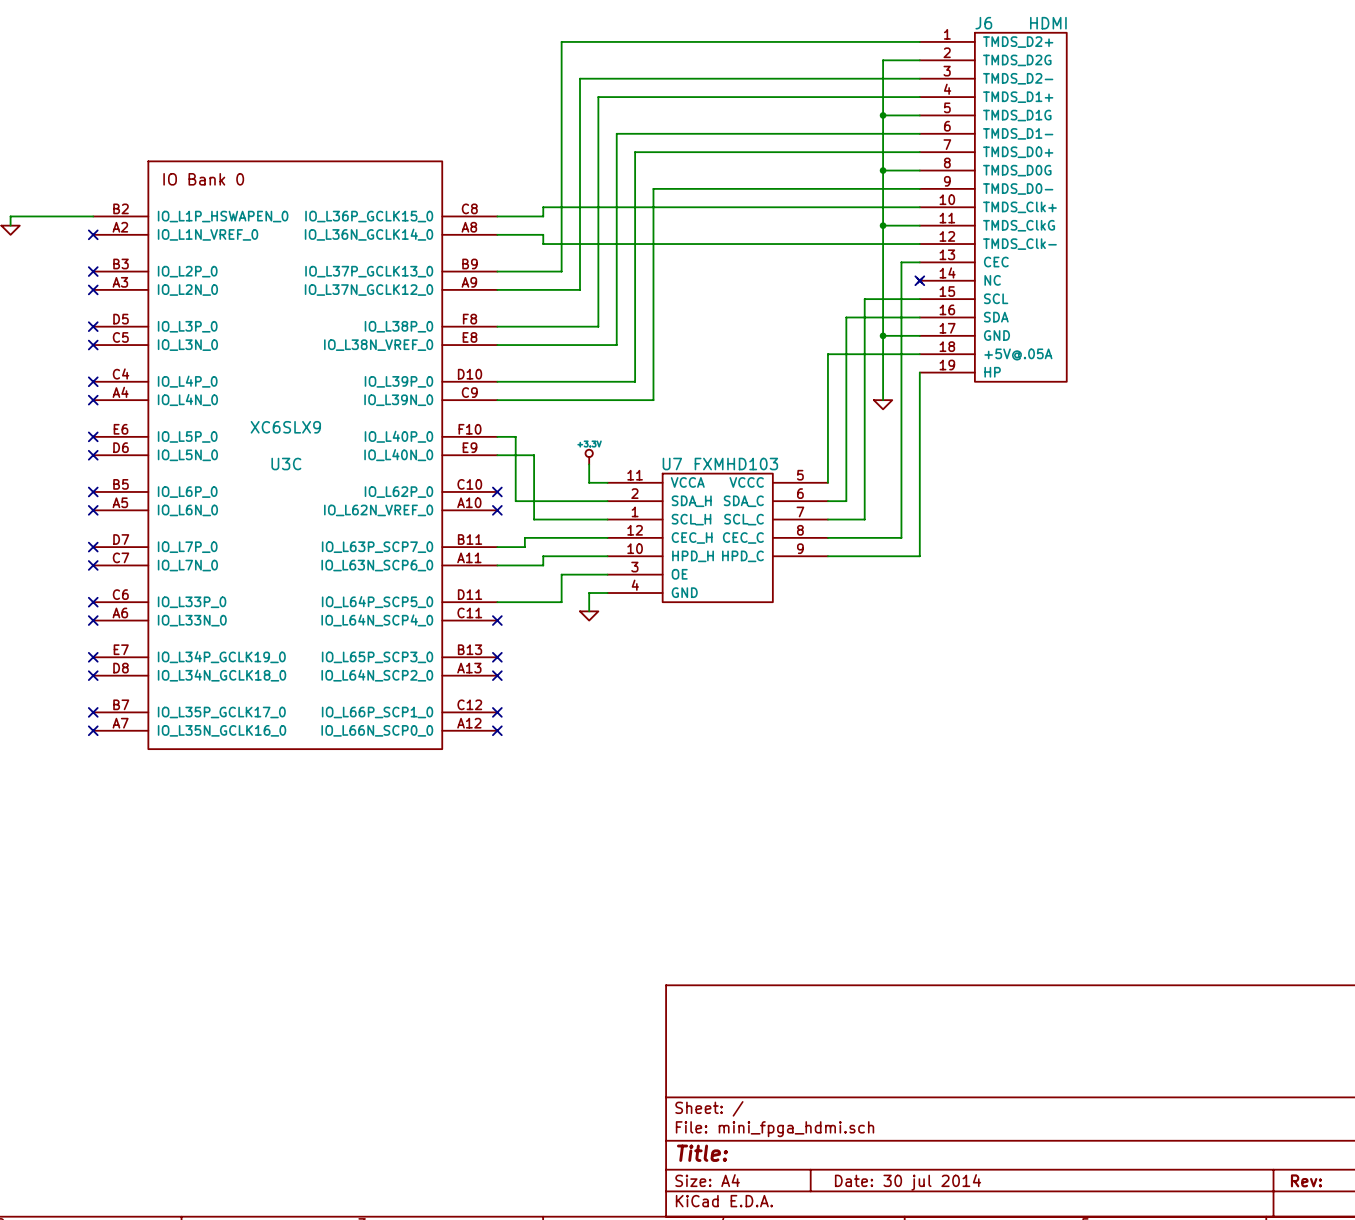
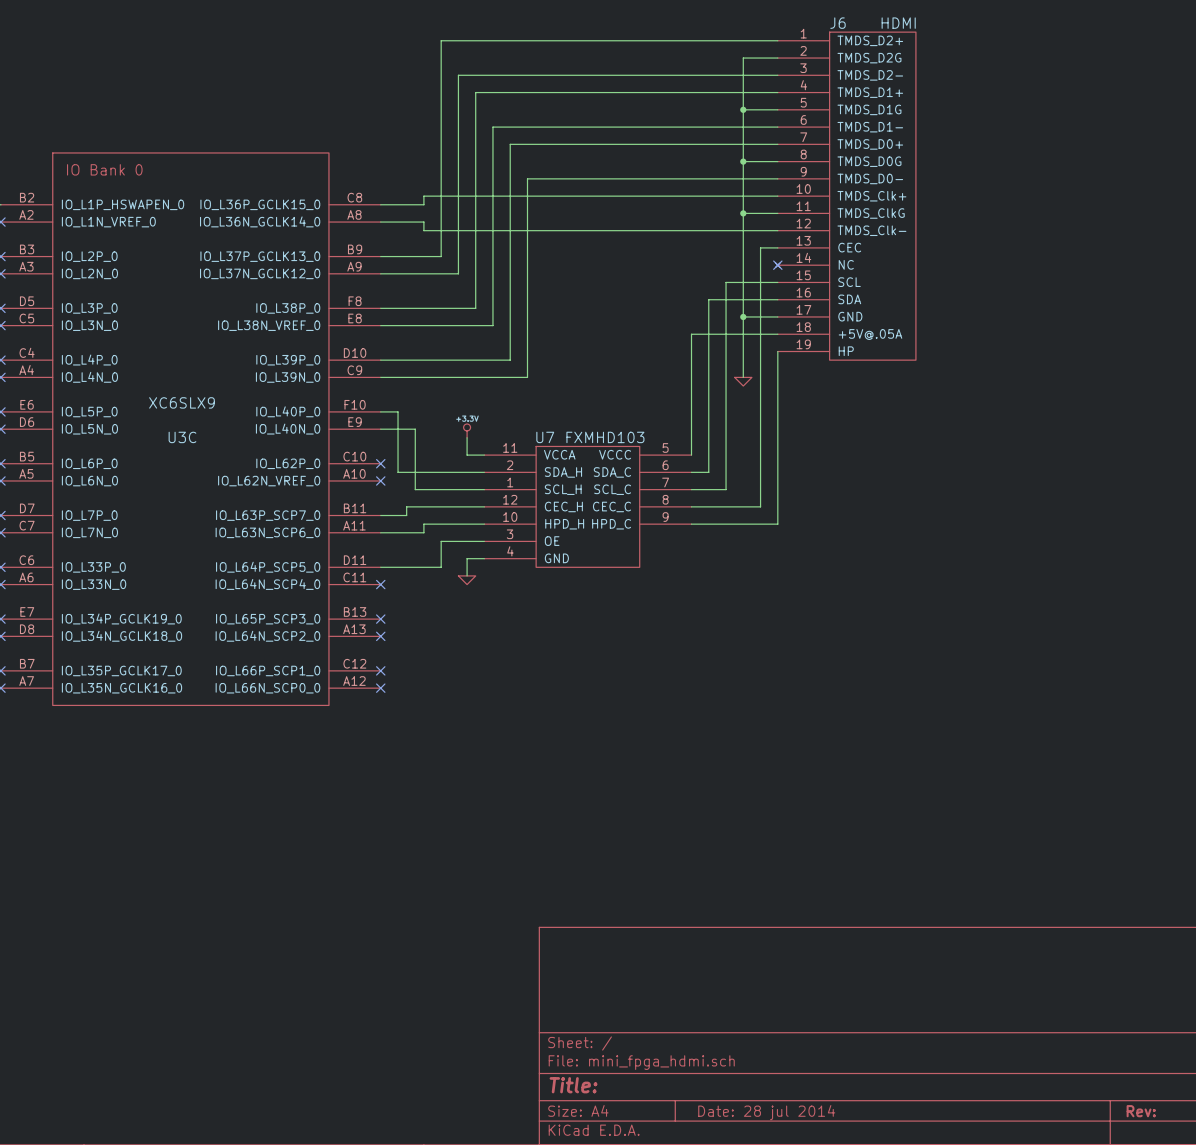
title block: Date: 30 jul 2014 (908, 1182) -> Date: 28 jul 2014 (766, 1112)

